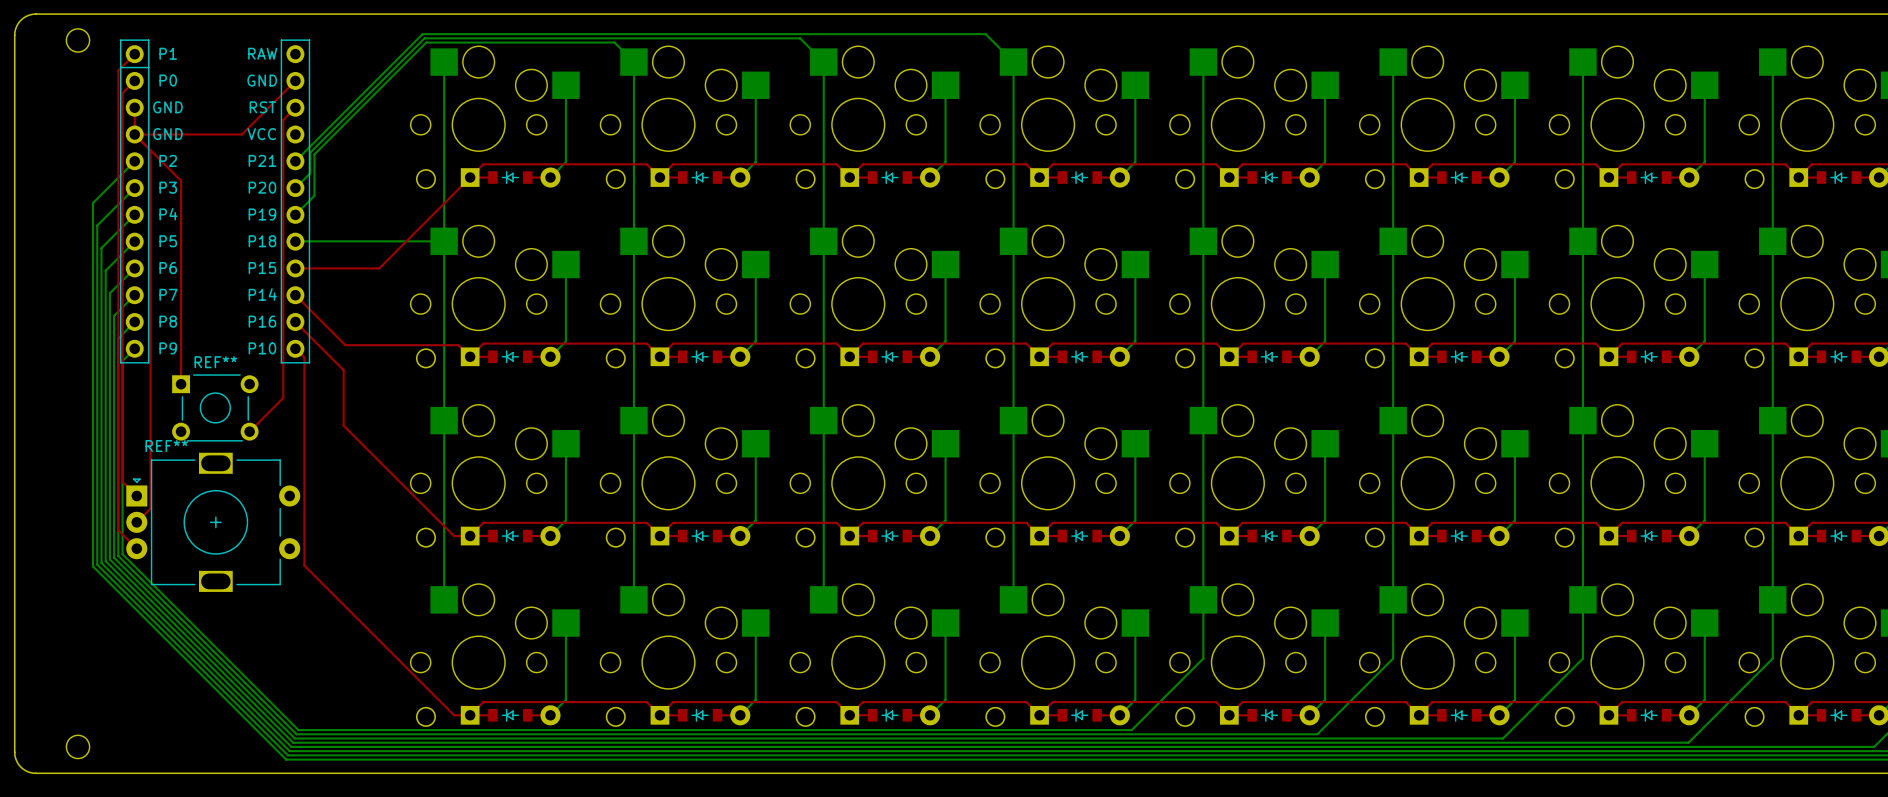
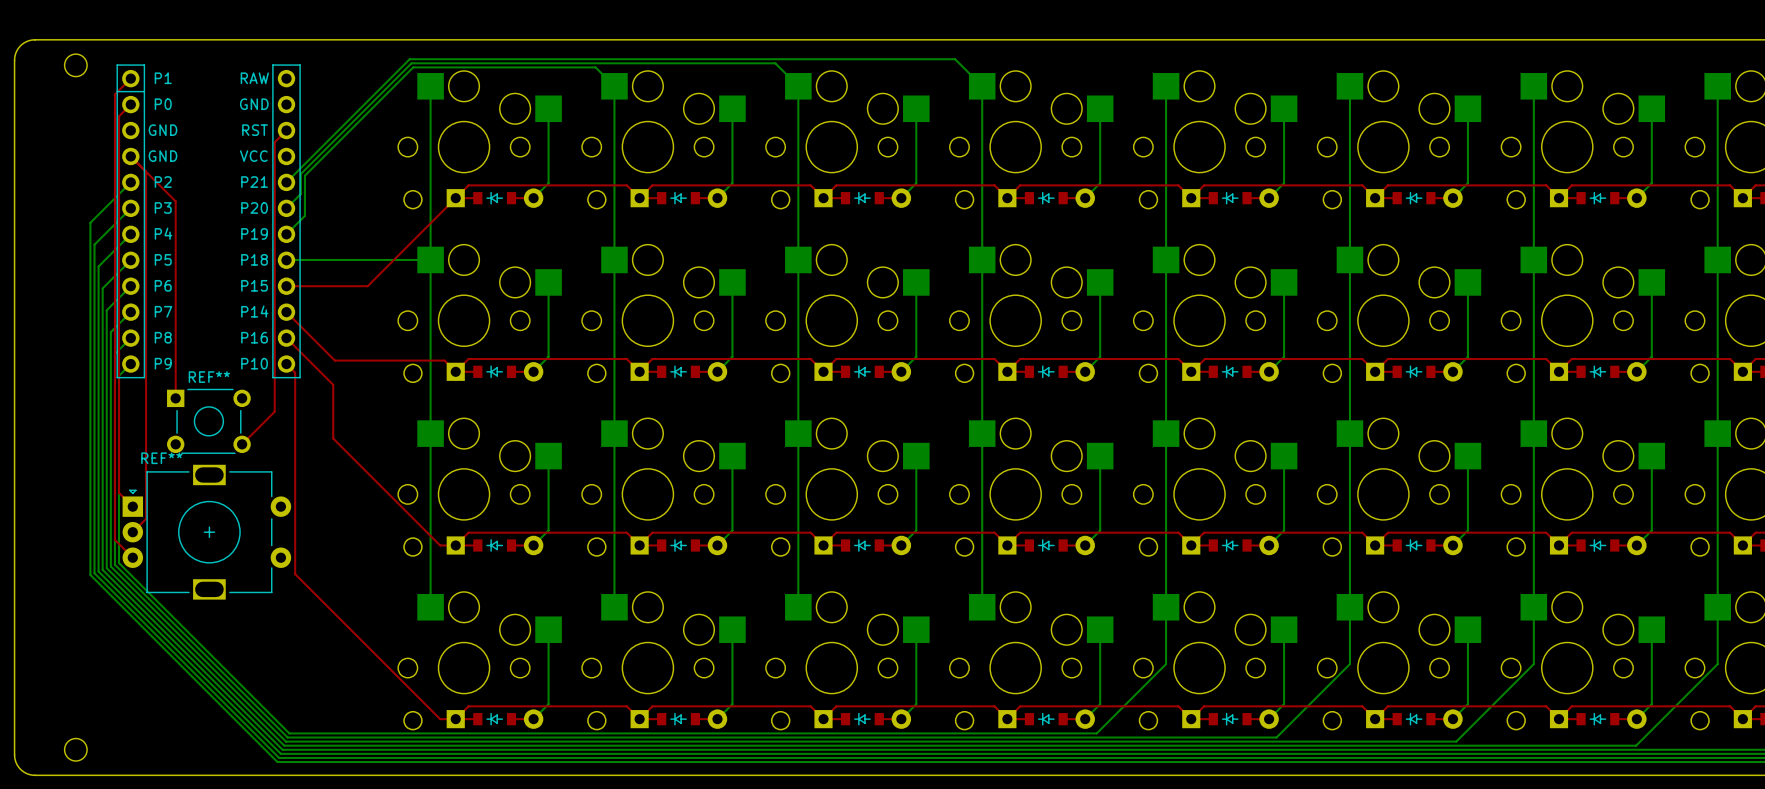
top track: (295, 80) (241, 134) (134, 134) (134, 107) -> none

